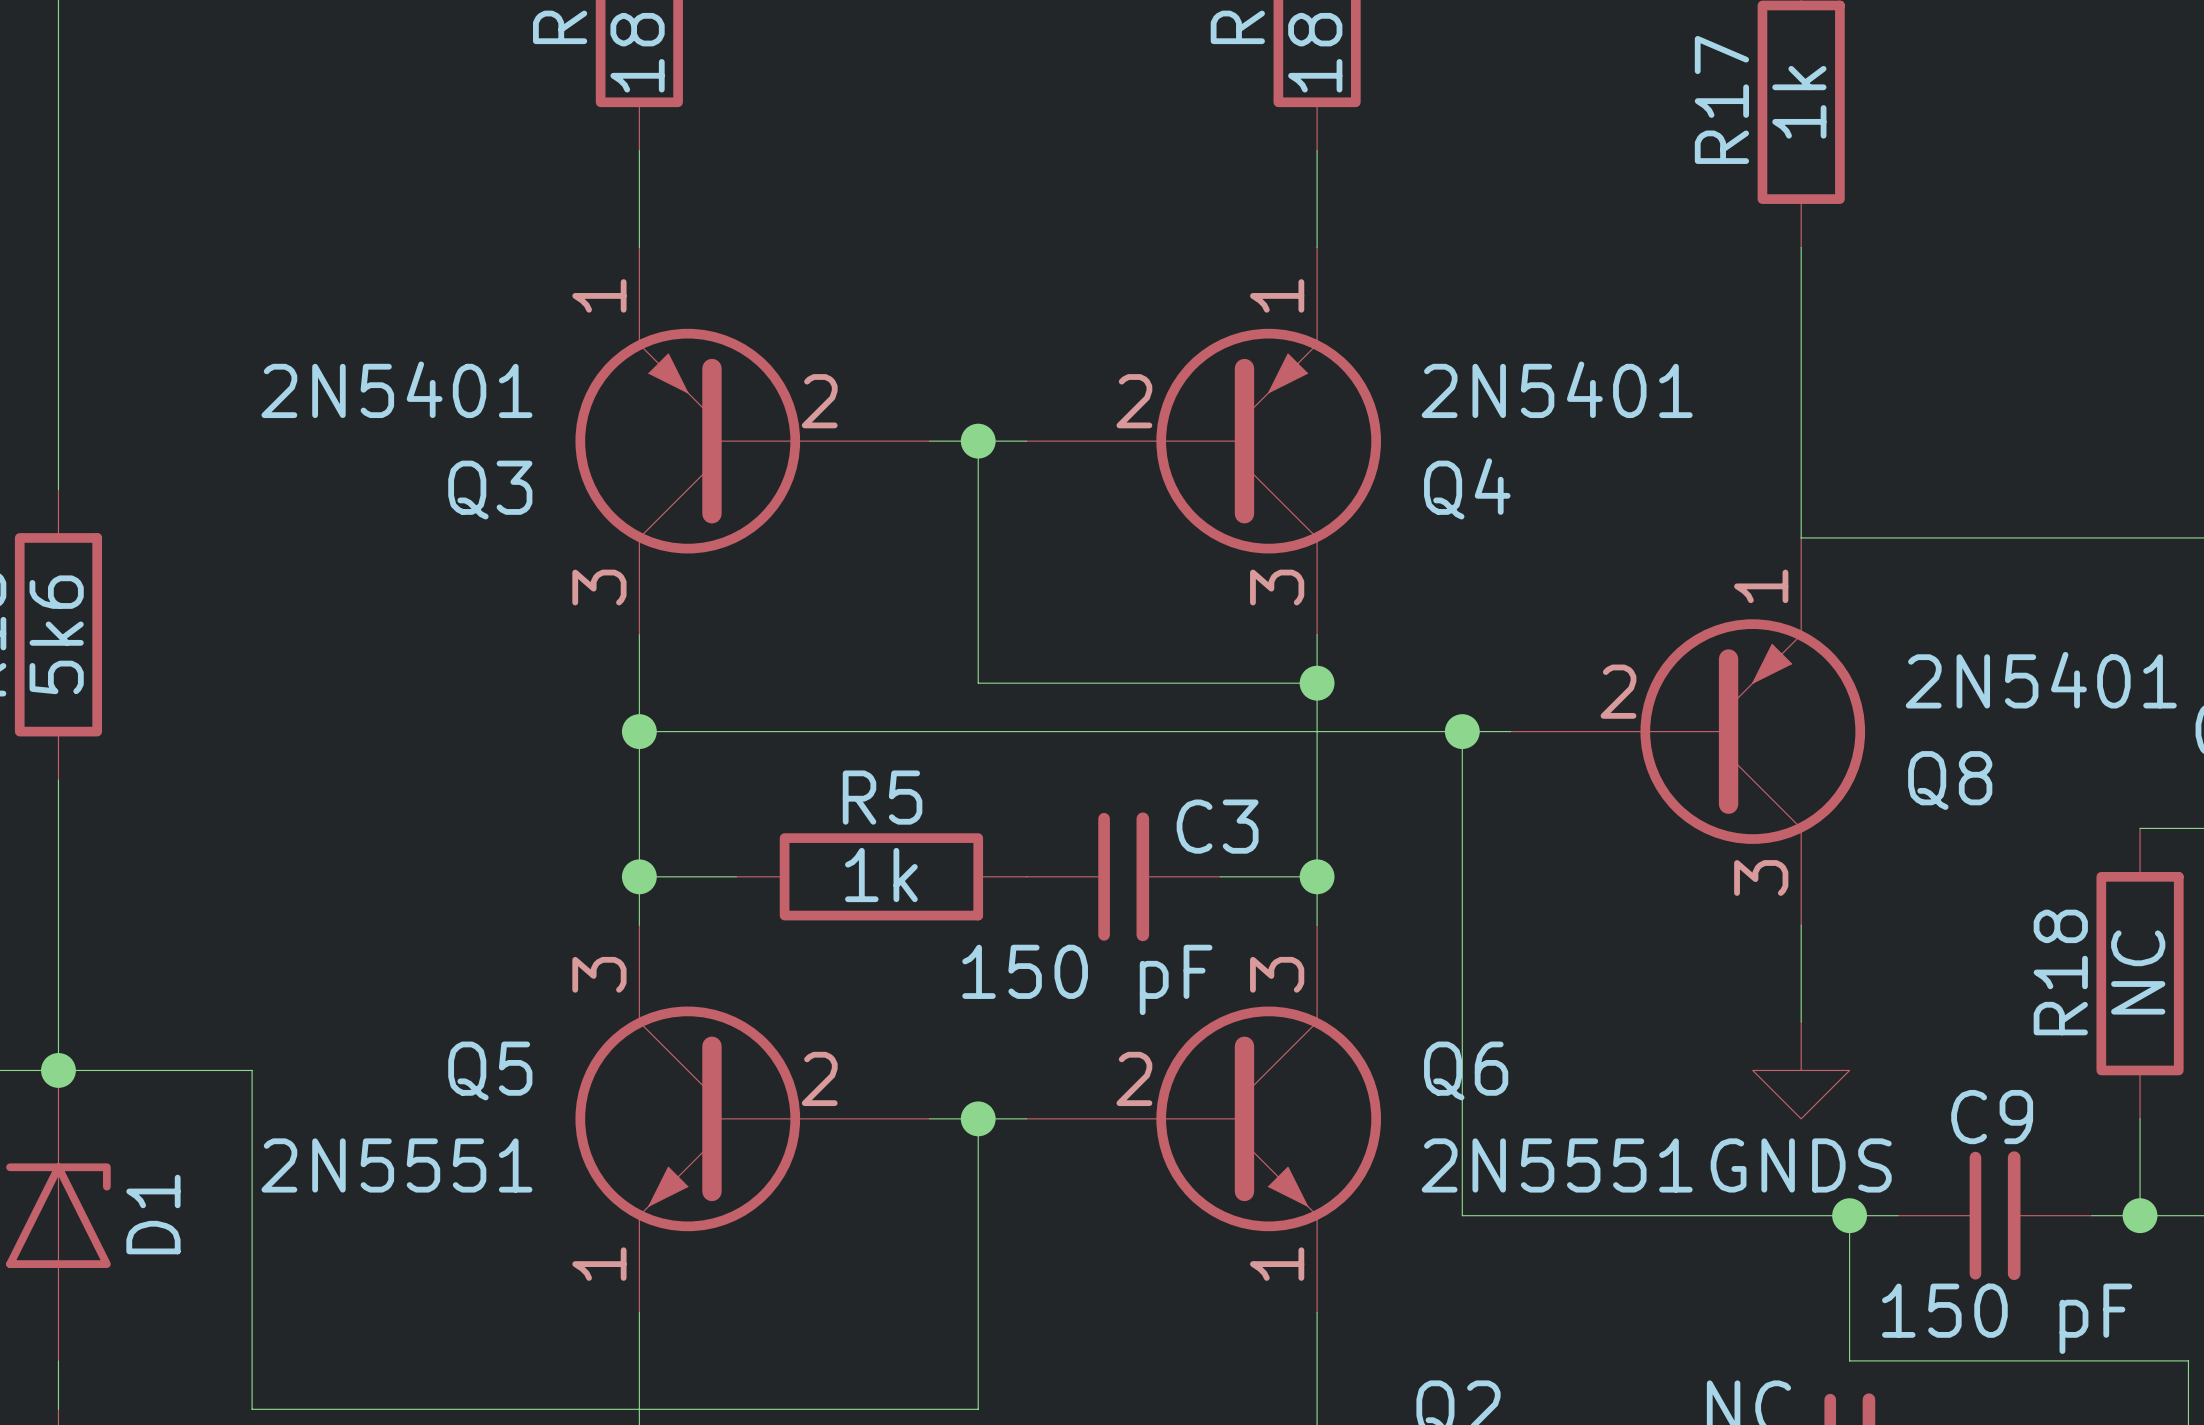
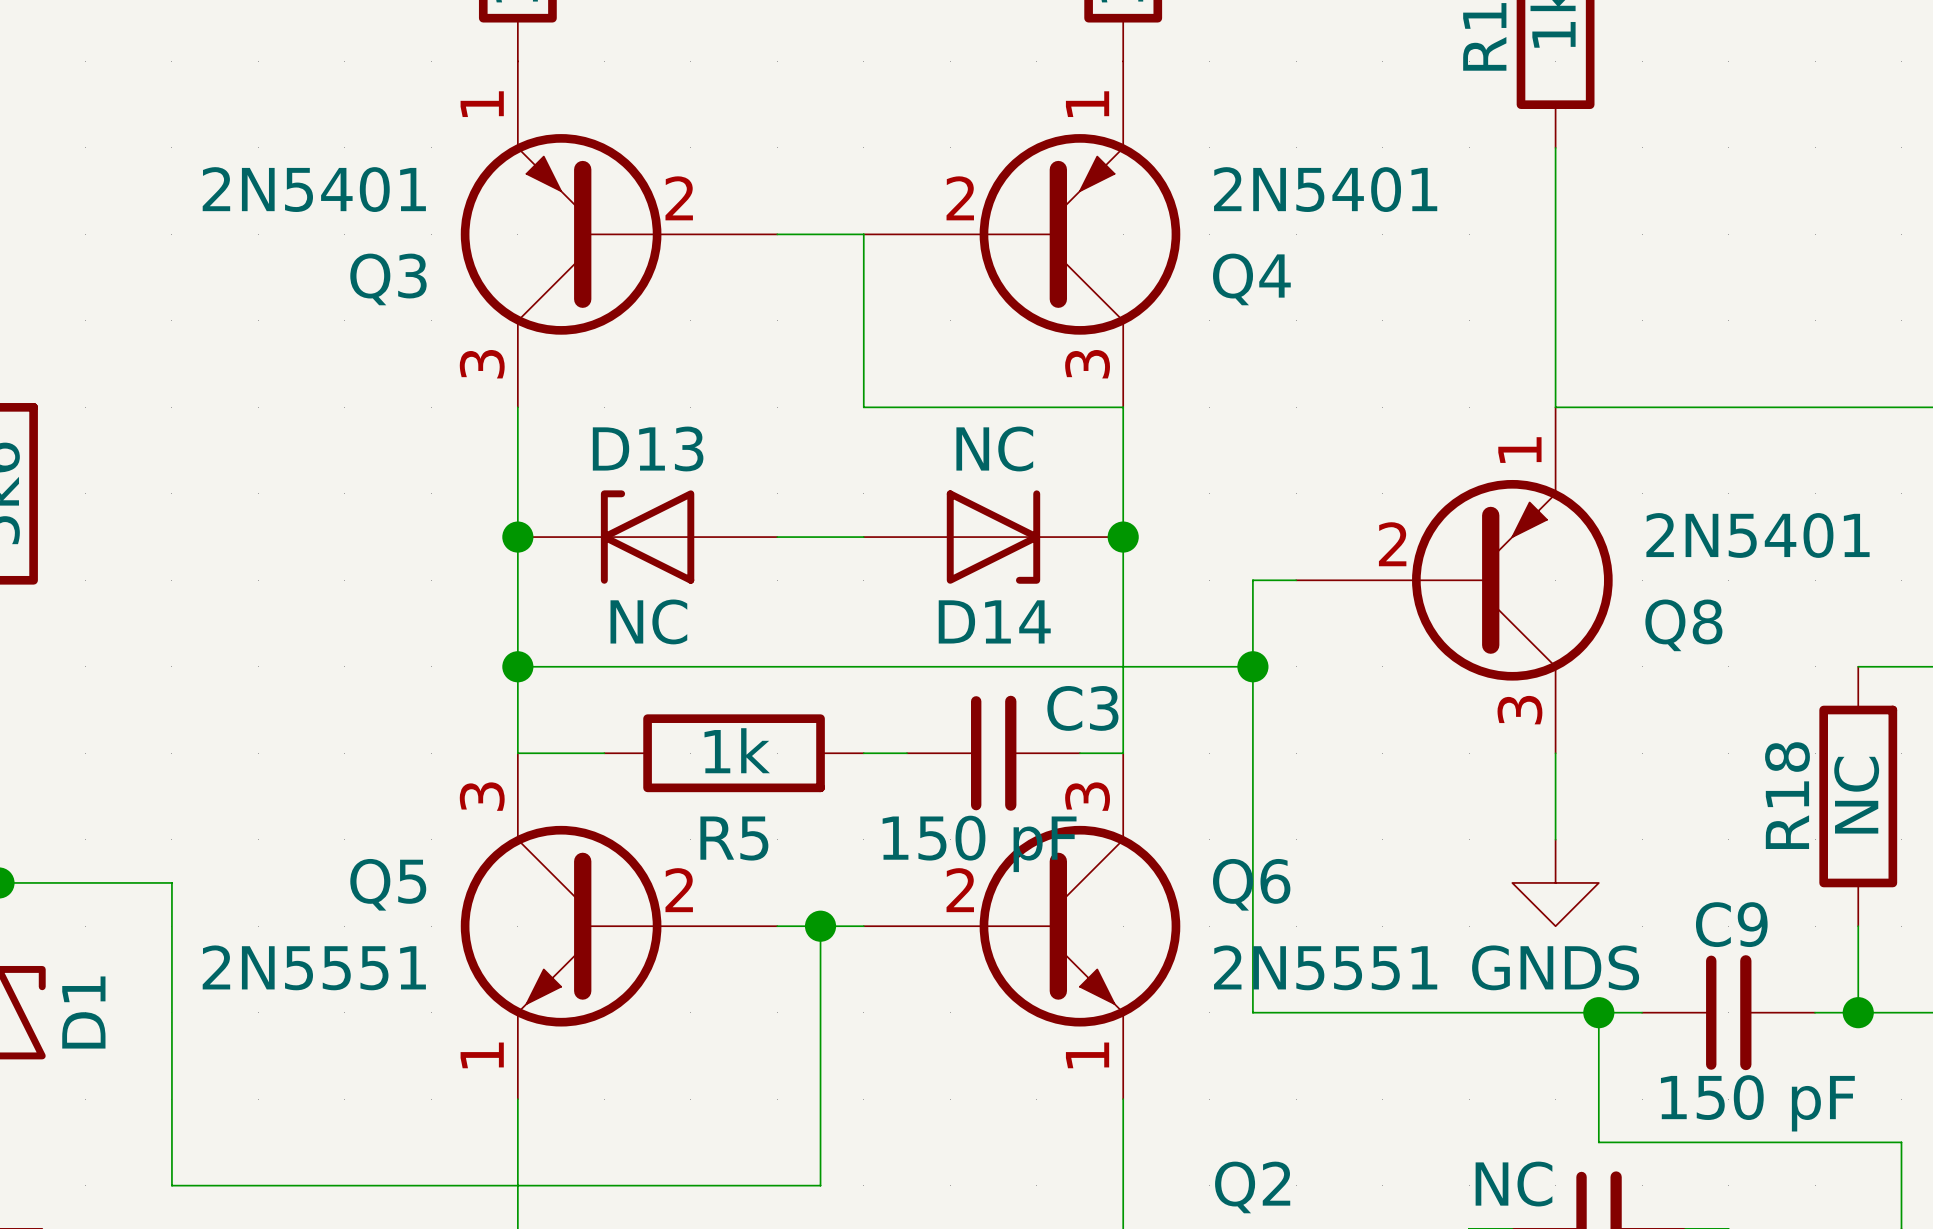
wire: none -> (777, 234) (863, 234) (863, 407) (1123, 407) (1123, 493)
Q3 position: (752, 441) -> (619, 234)
wire: (929, 441) (1026, 441) -> none
wire: (978, 441) (978, 683) -> (777, 537) (820, 537)
junction: (978, 441) -> none
Q4 position: (1203, 441) -> (1022, 234)
junction: none -> (517, 537)
D13: none -> NC (647, 537)
D14: none -> NC (993, 537)
wire: (639, 731) (1462, 731) -> (517, 666) (1252, 666)
junction: (639, 731) -> none
junction: (1462, 731) -> none
R5 name position: R5 (882, 797) -> R5 (734, 838)
junction: none -> (517, 666)
junction: none -> (1252, 666)
wire: (639, 876) (736, 876) -> (517, 753) (604, 753)
junction: (639, 876) -> none
R5 position: (881, 876) -> (734, 753)
C3 position: (1123, 876) -> (993, 753)
wire: (1220, 876) (1317, 876) -> none
junction: (1317, 876) -> none
wire: none -> (863, 753) (907, 753)
wire: none -> (1079, 753) (1123, 753)

